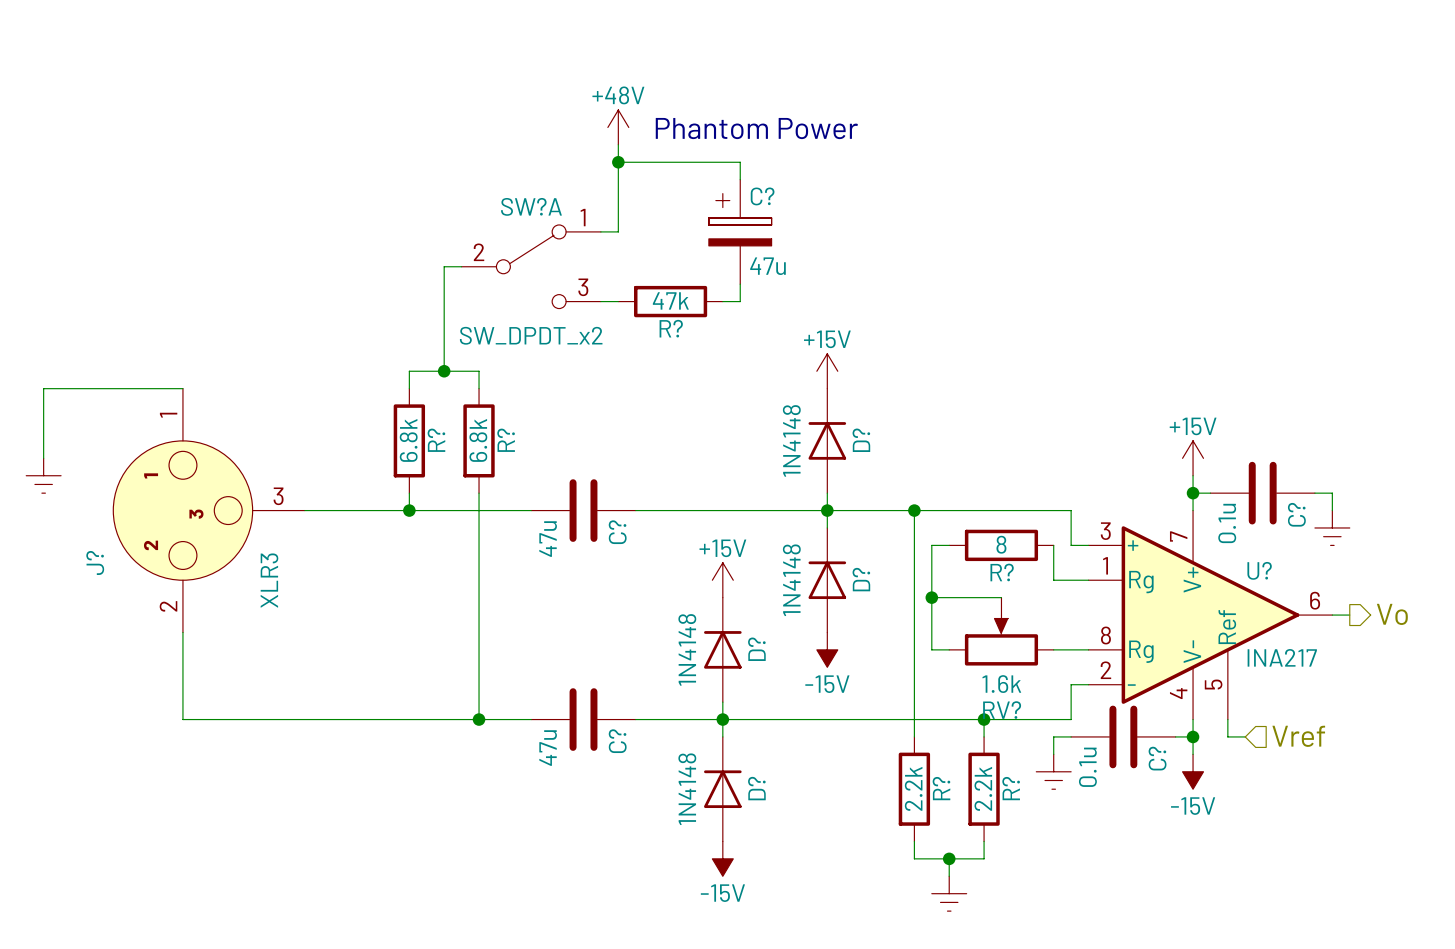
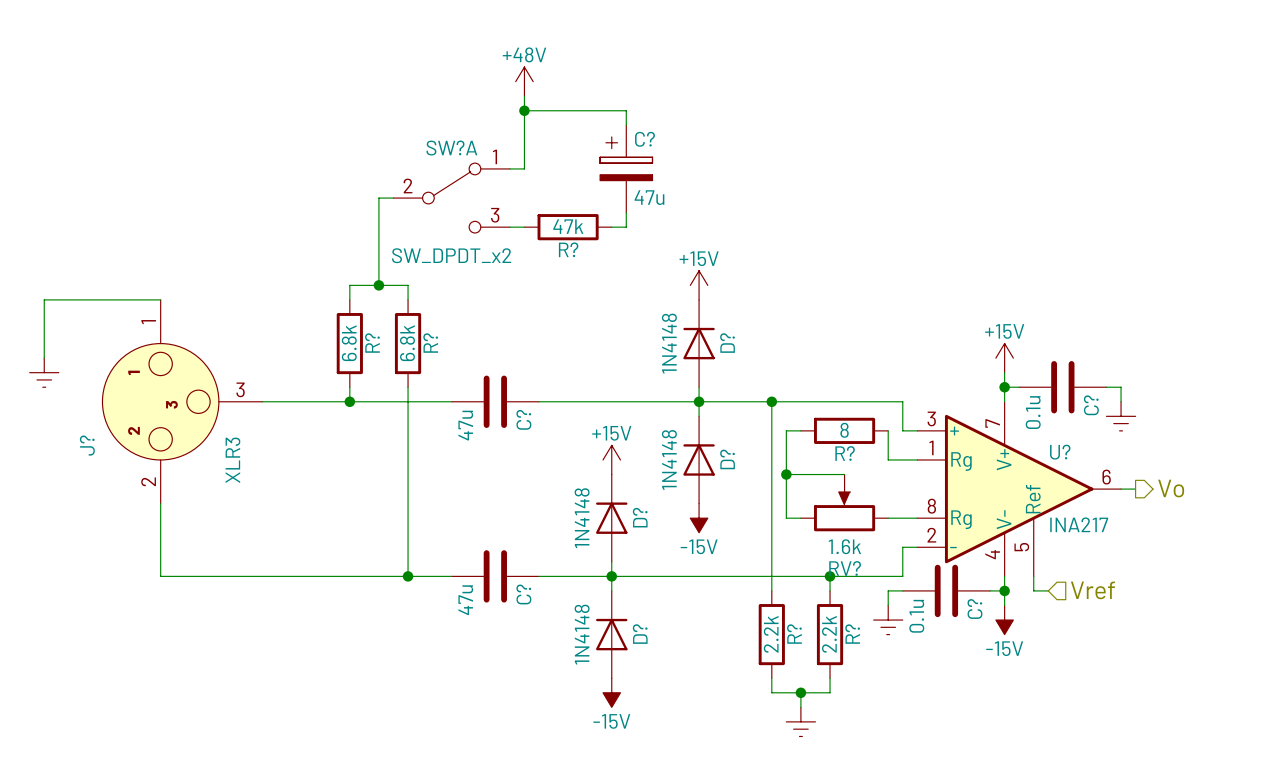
text: Phantom Power (756, 128) -> none

